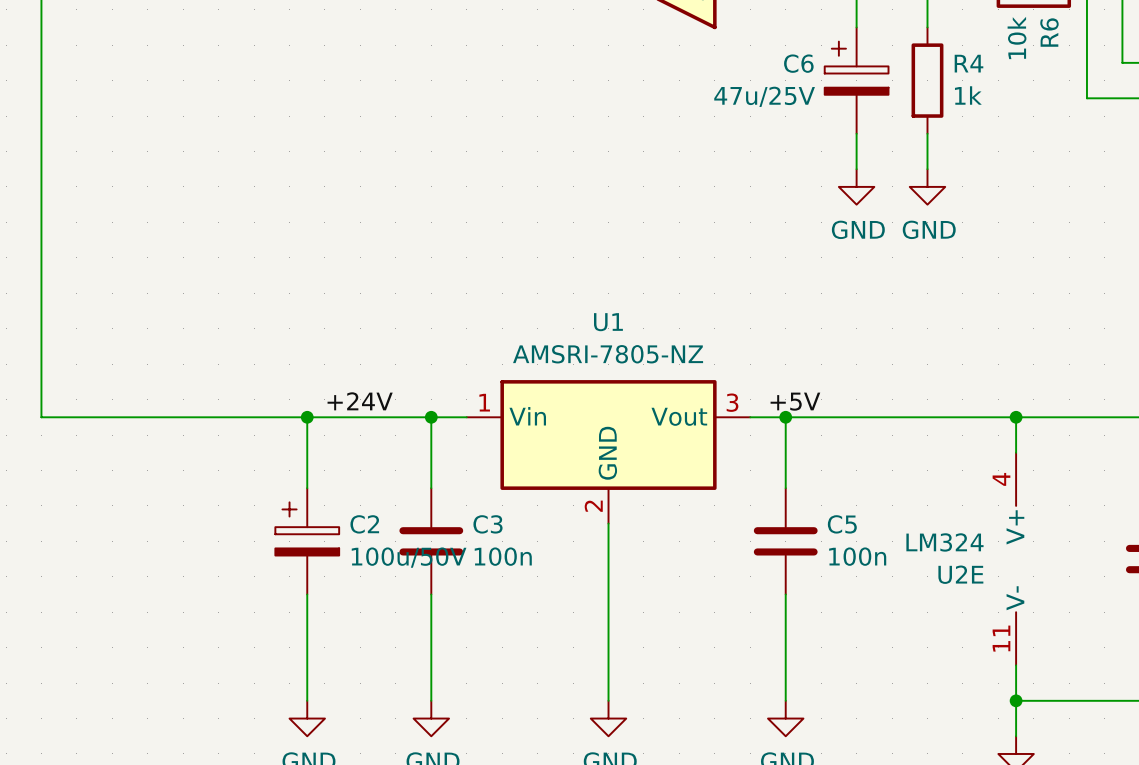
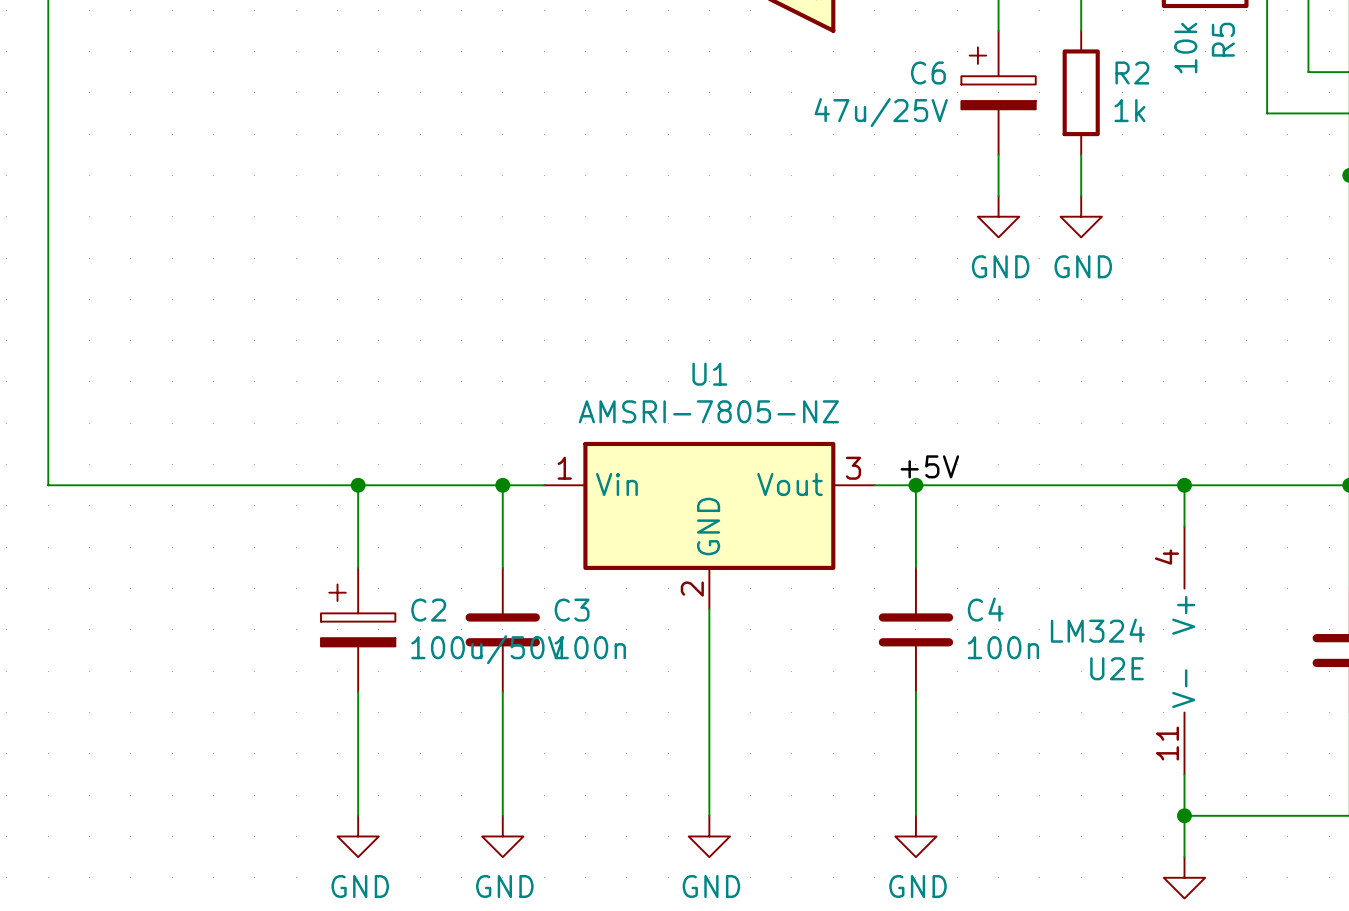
R6 name: R6 (1049, 32) -> R5 (1223, 39)
R4 name: R4 (968, 63) -> R2 (1132, 72)
label: +24V (360, 401) -> none
C5 name: C5 (842, 524) -> C4 (985, 609)

